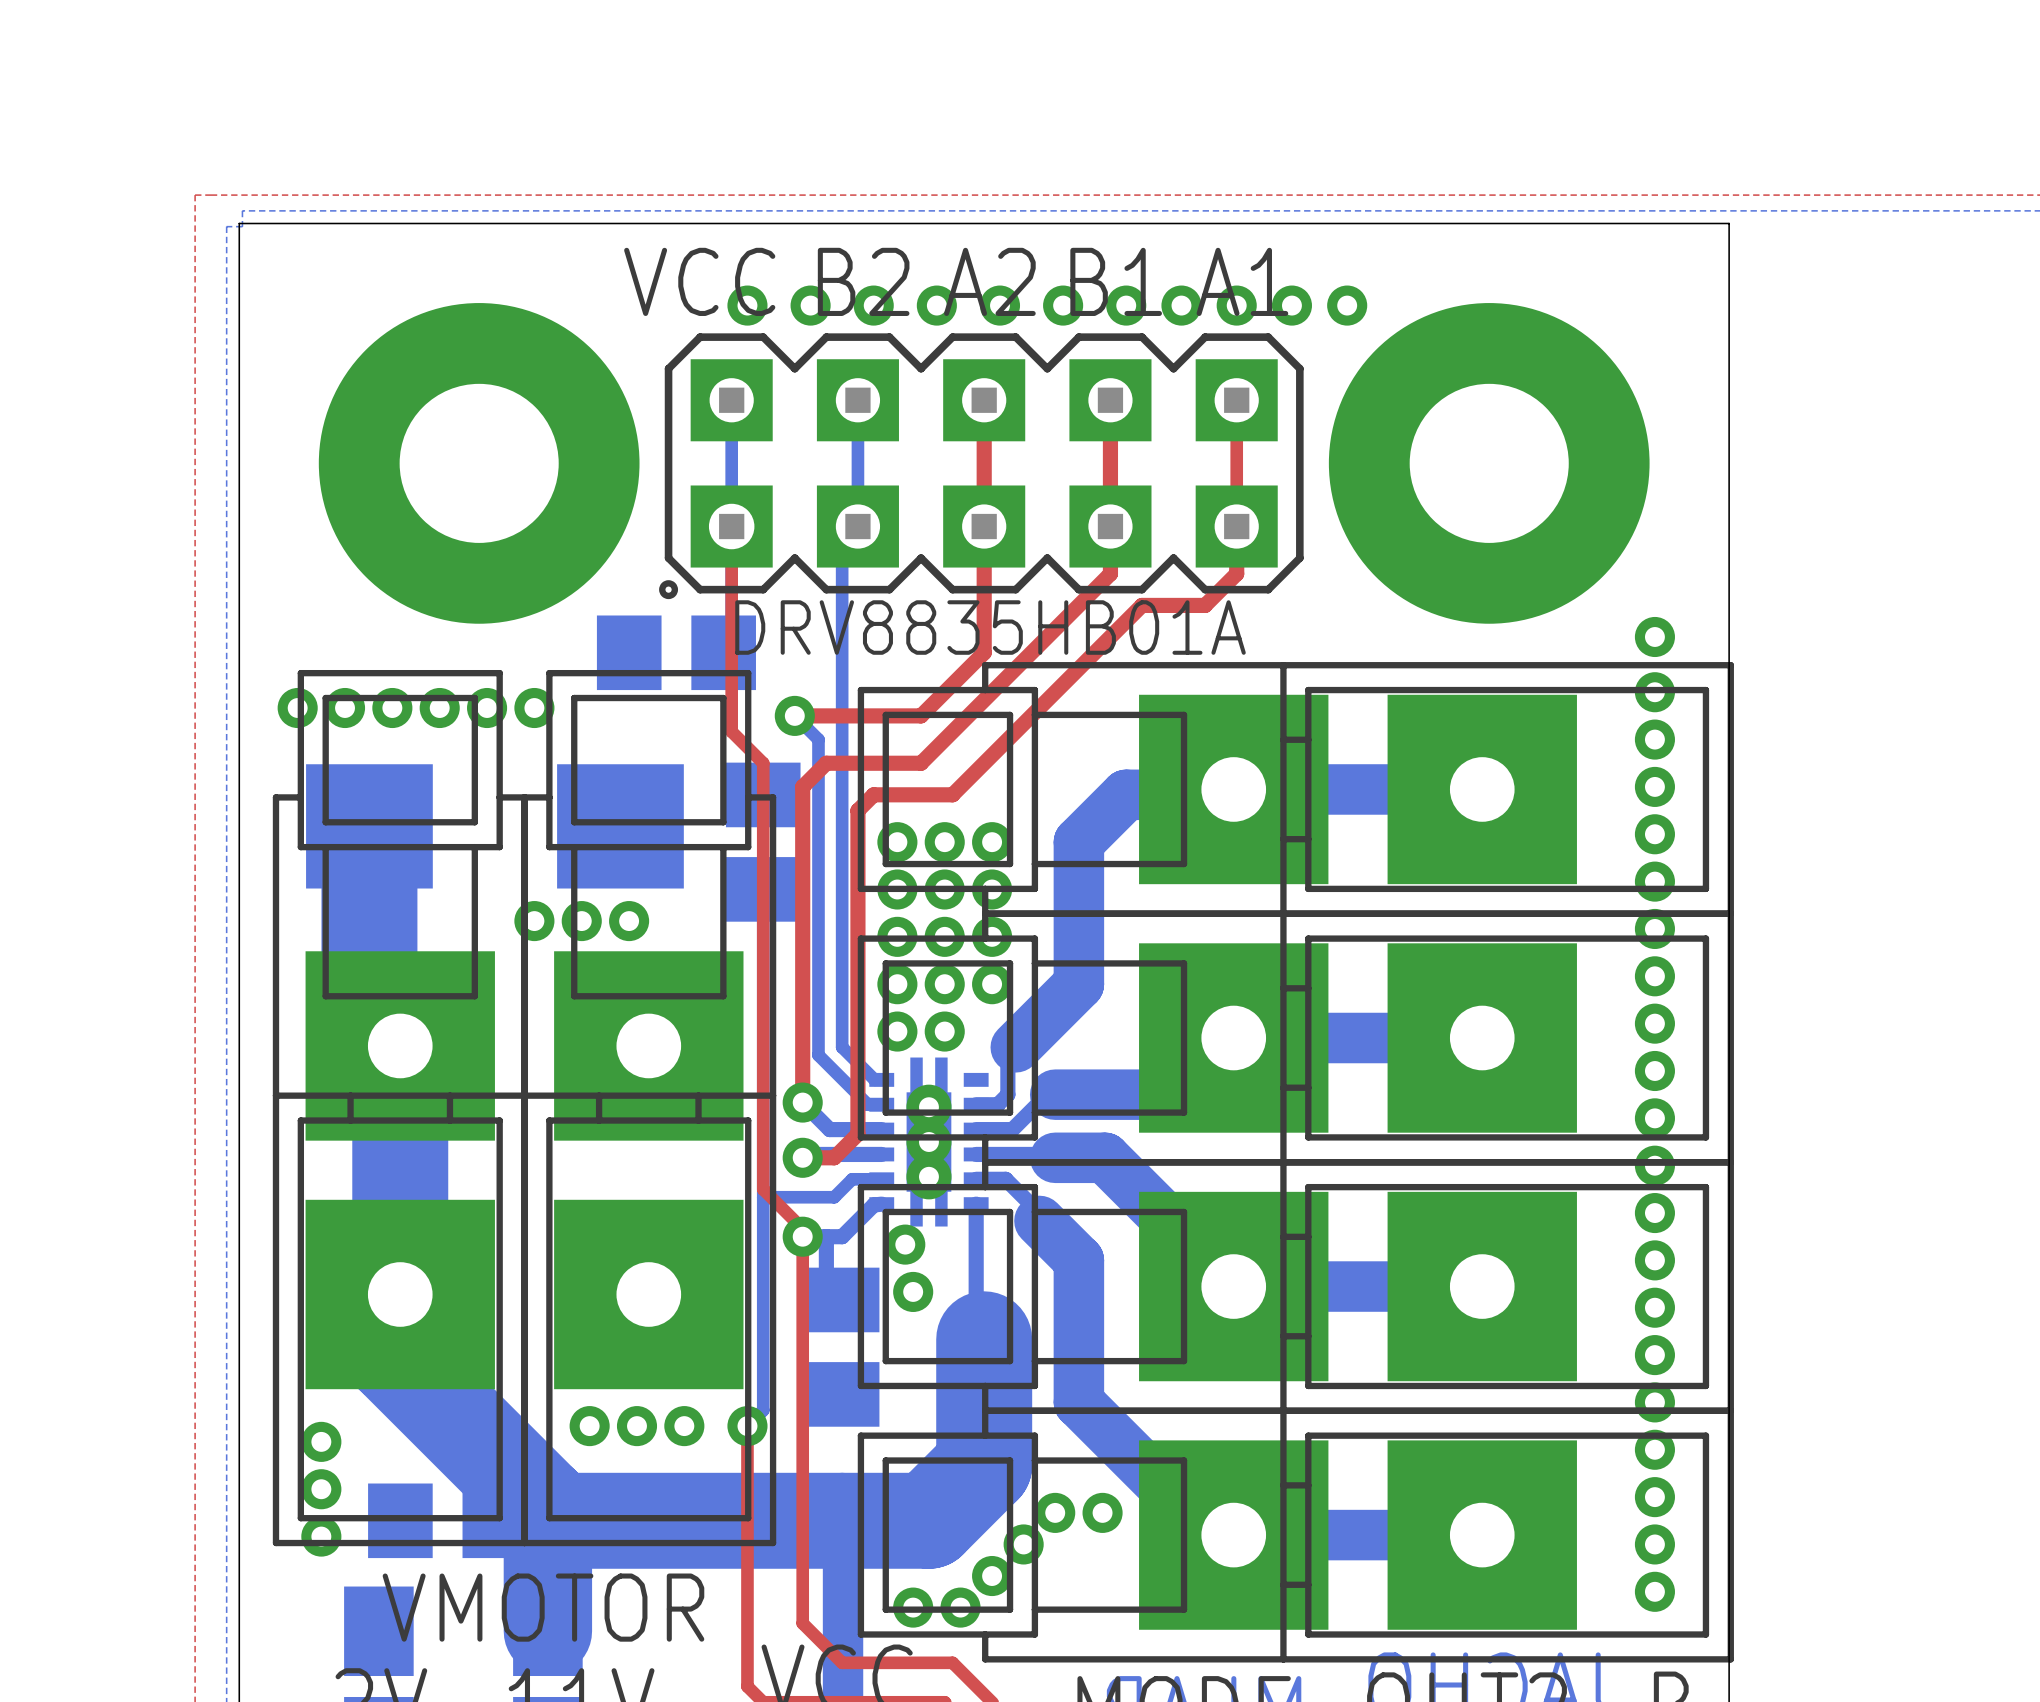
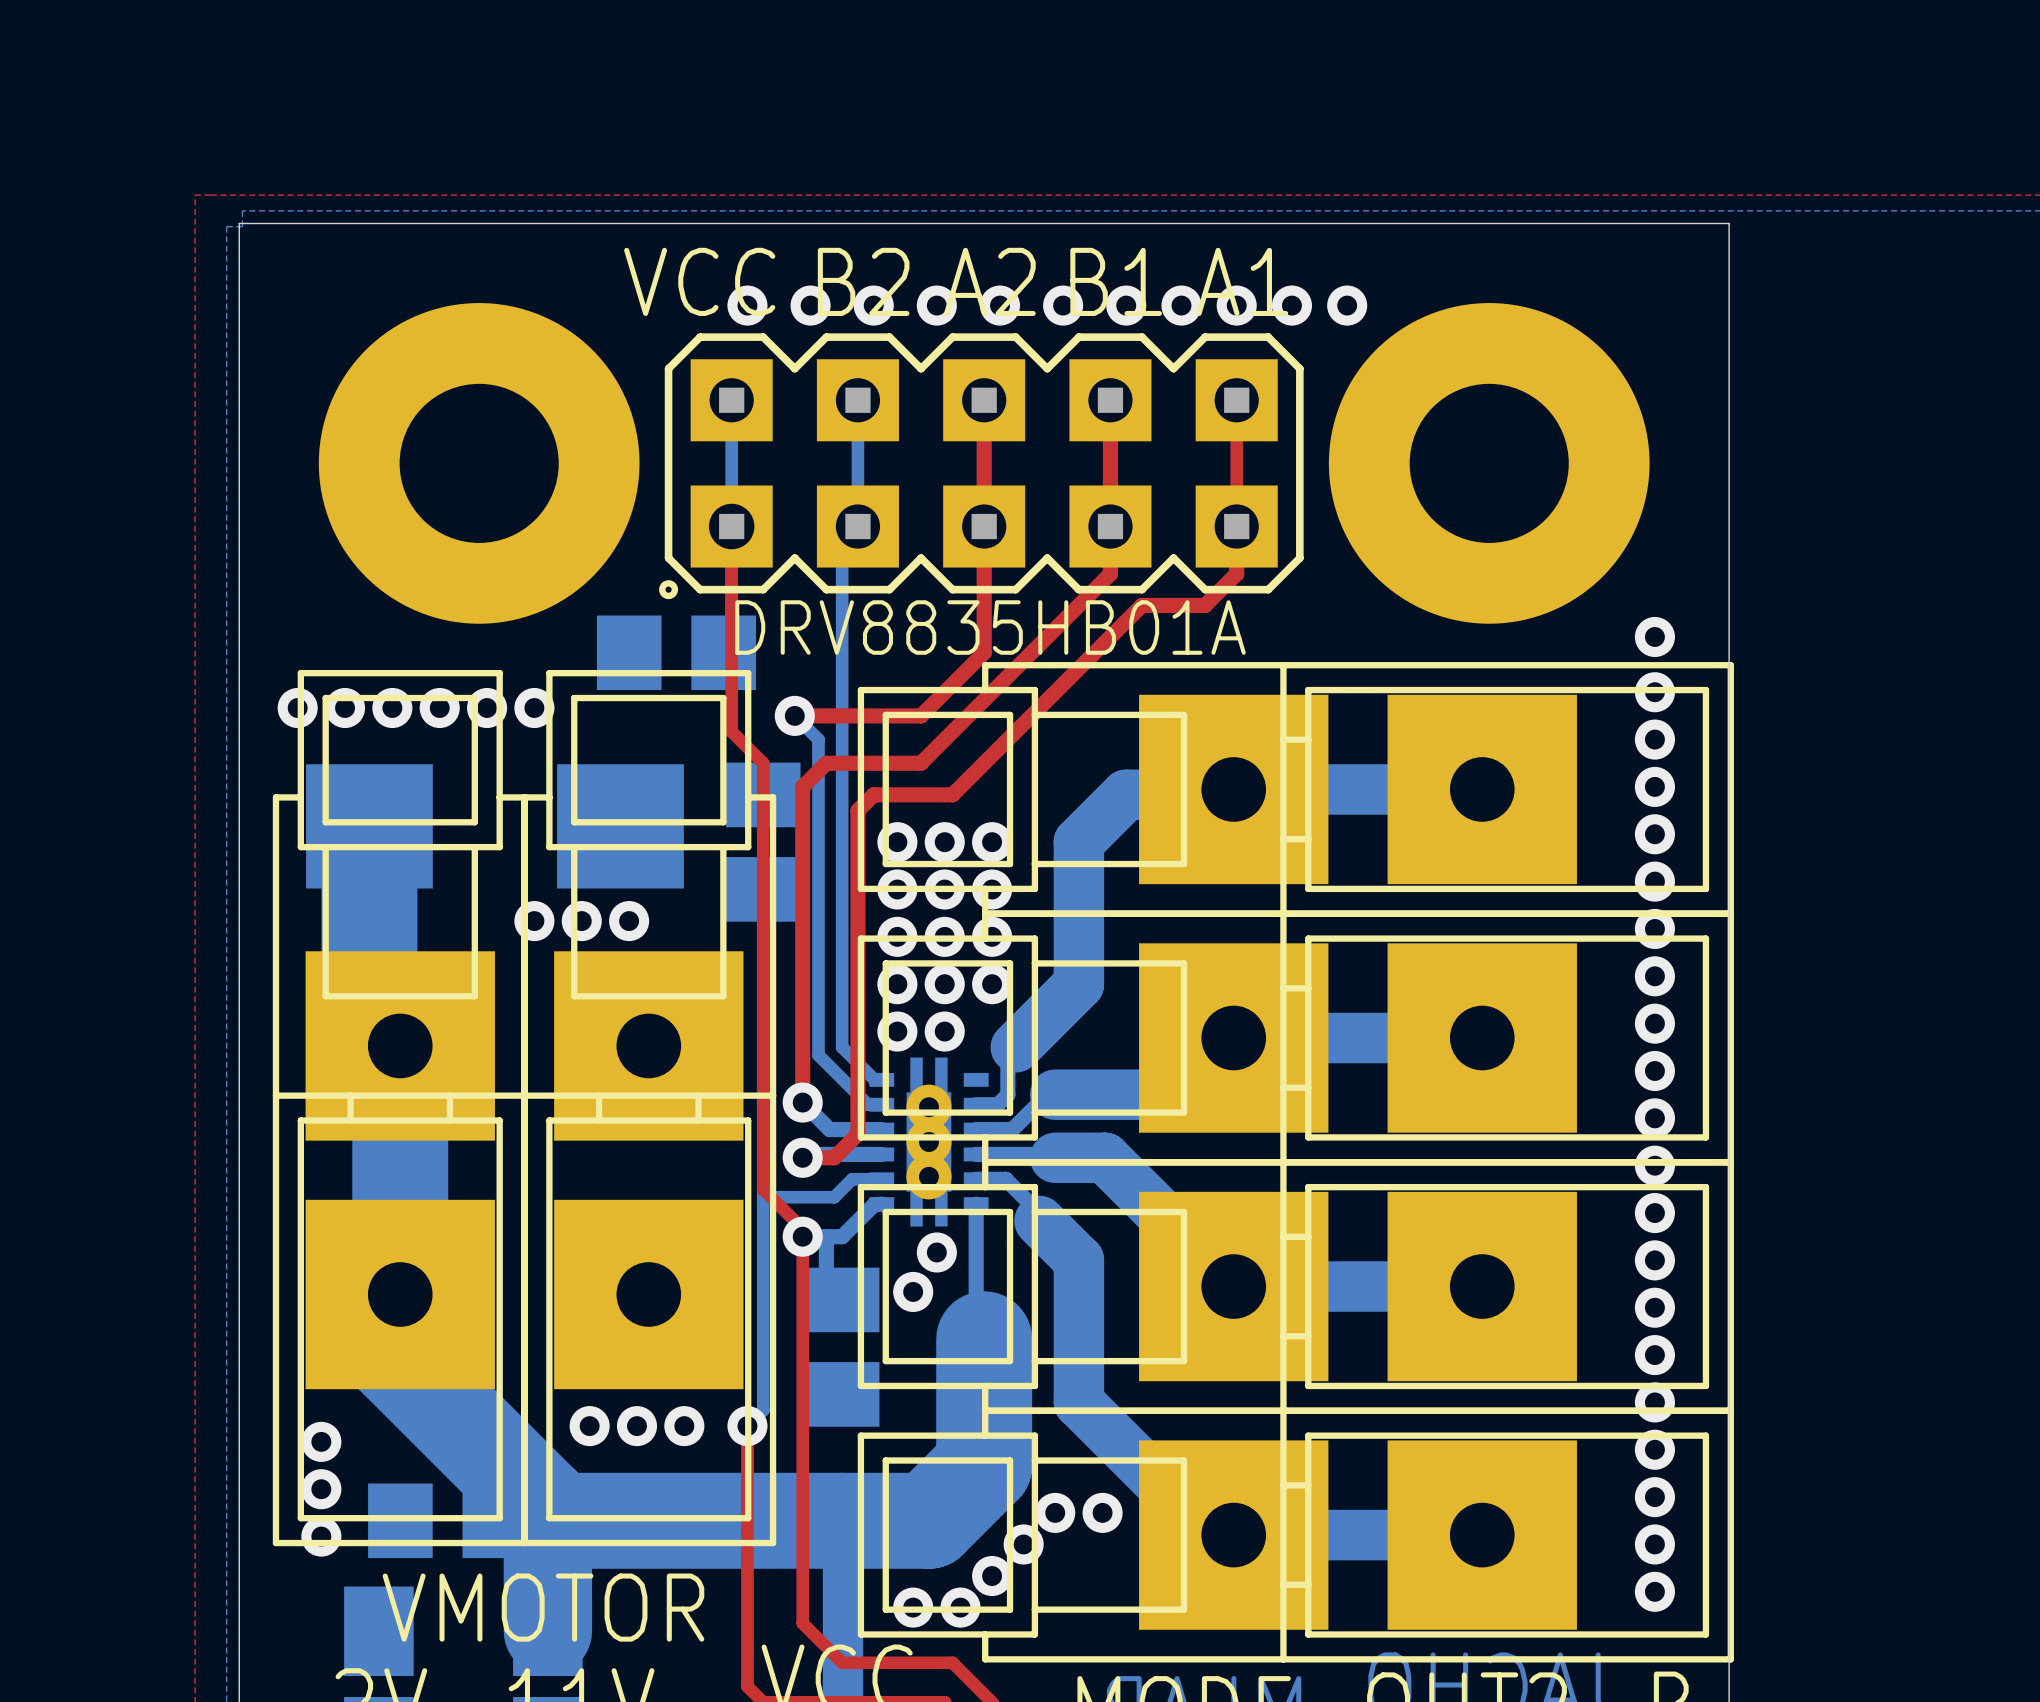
via position: (905, 1244) -> (936, 1252)

